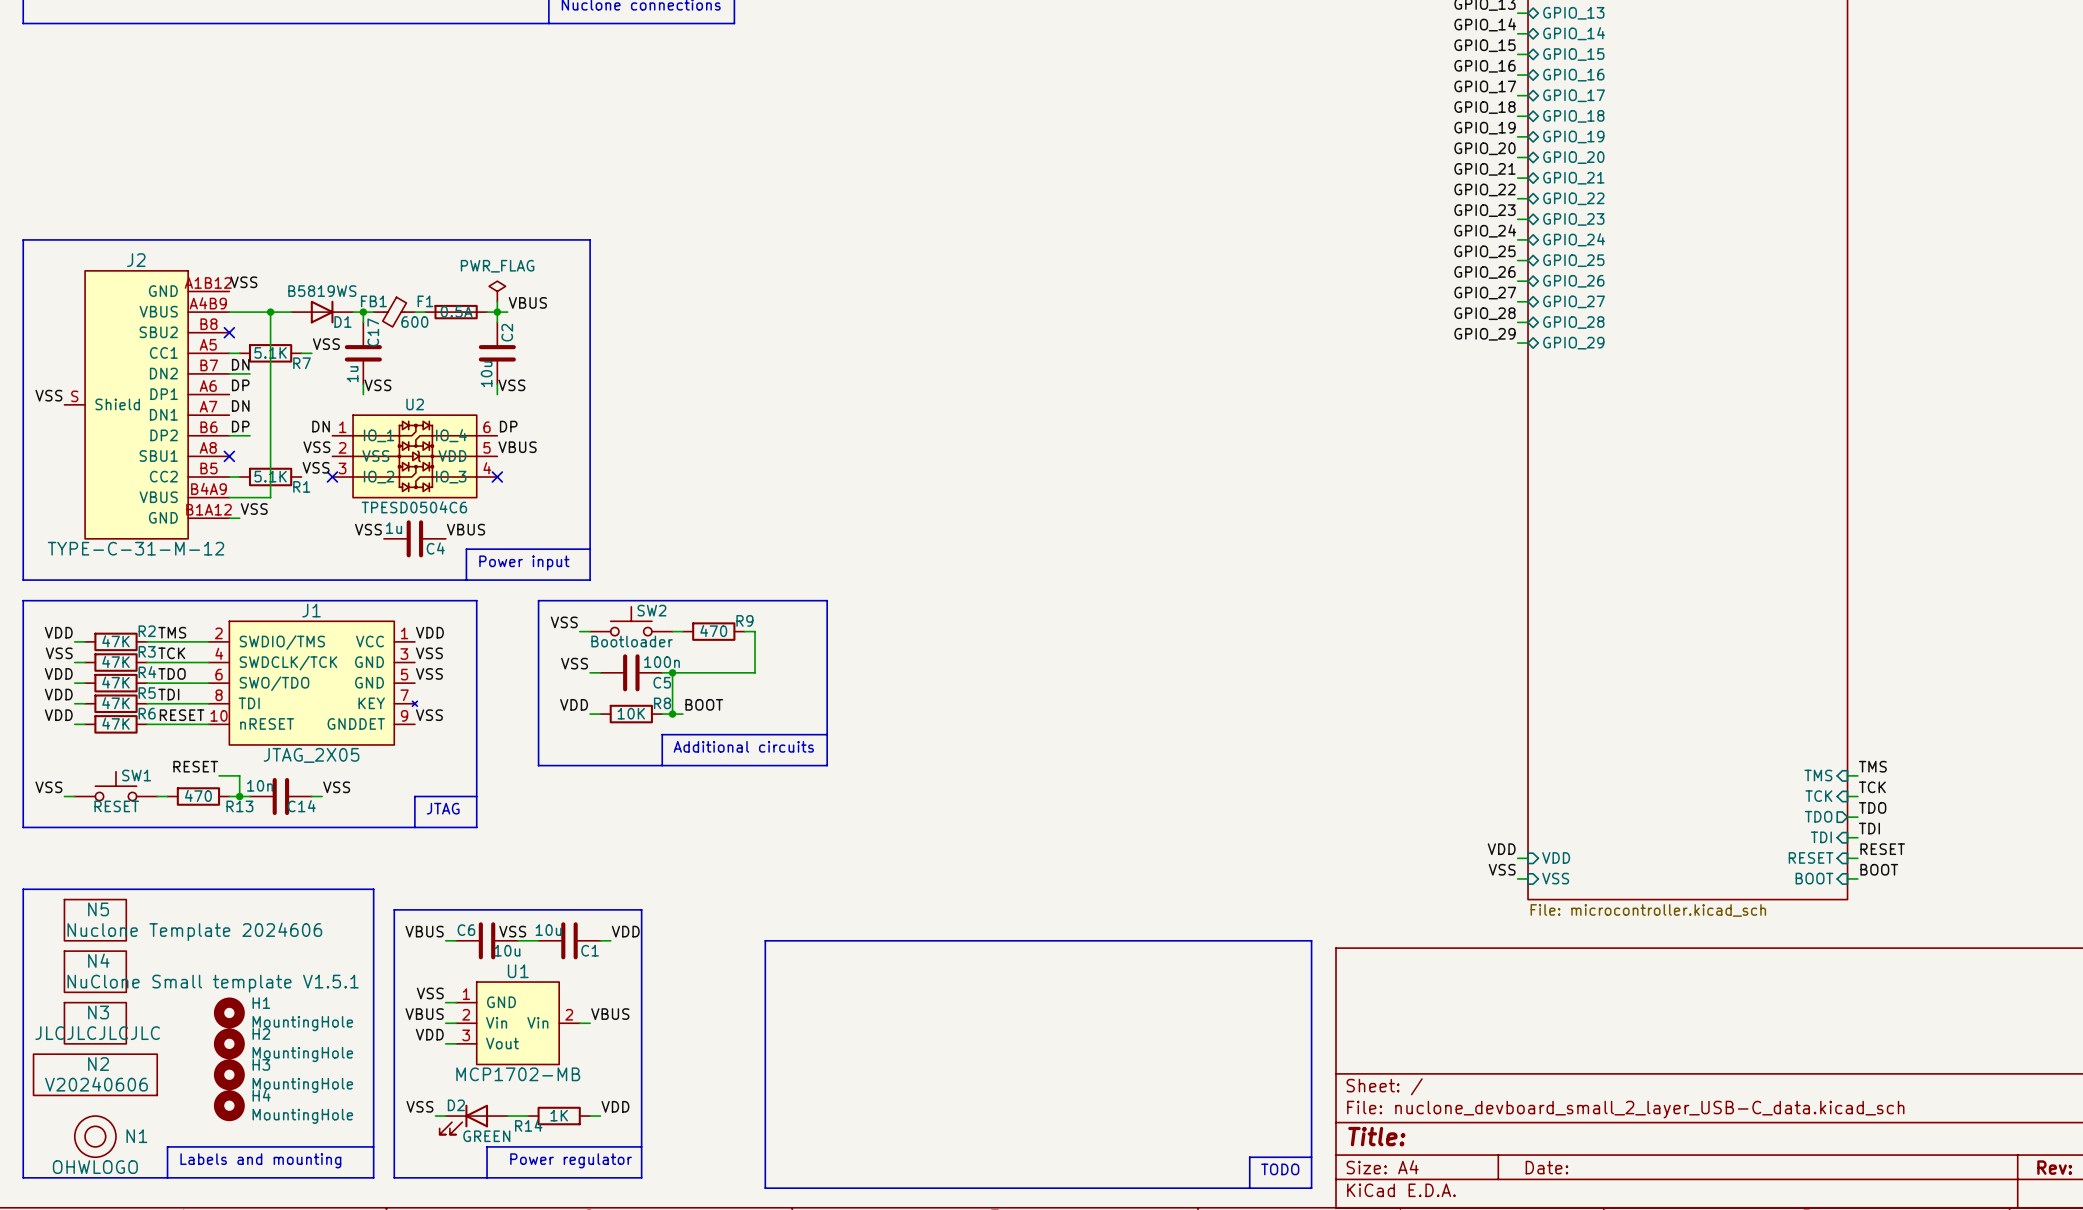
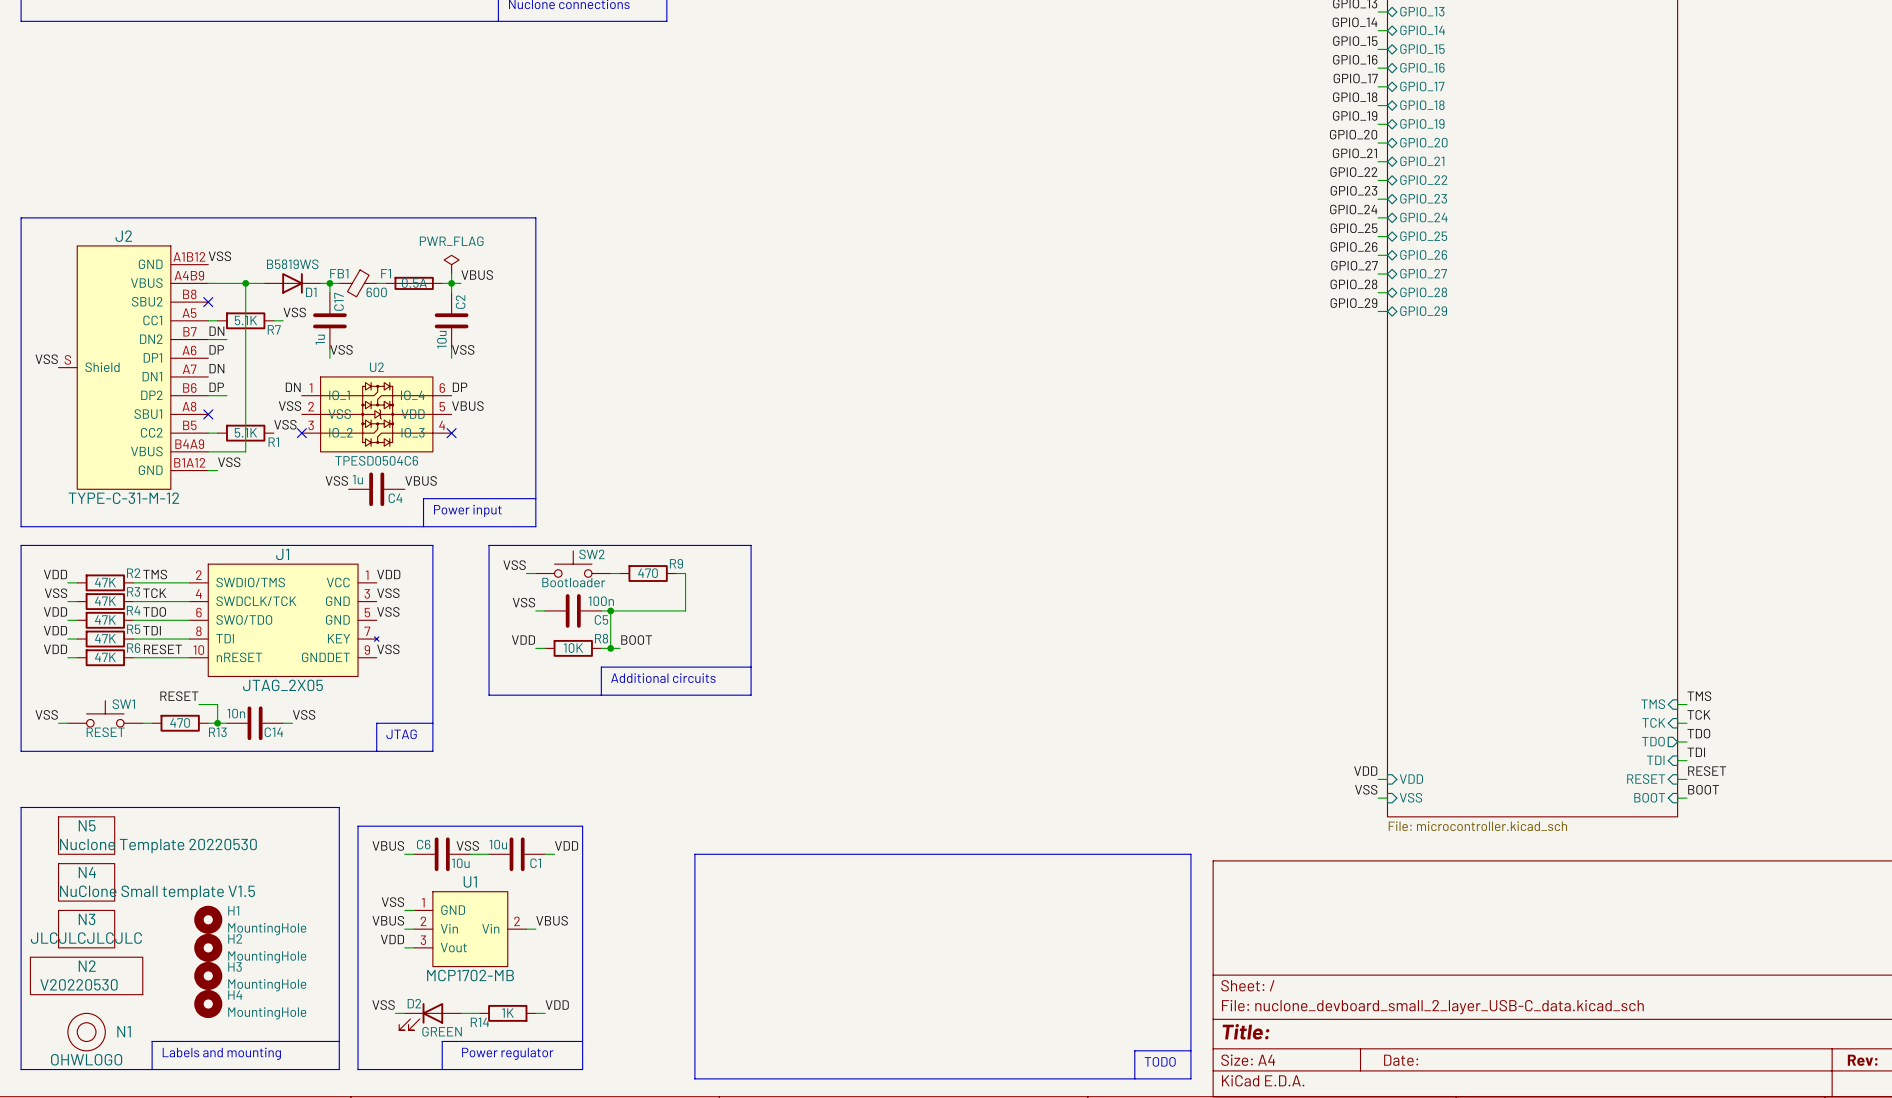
N5 value: Nuclone Template 2024606 (194, 931) -> Nuclone Template 20220530 (158, 845)
N4 value: NuClone Small template V1.5.1 (213, 983) -> NuClone Small template V1.5 (157, 892)
N2 value: V20240606 (96, 1084) -> V20220530 (78, 984)

